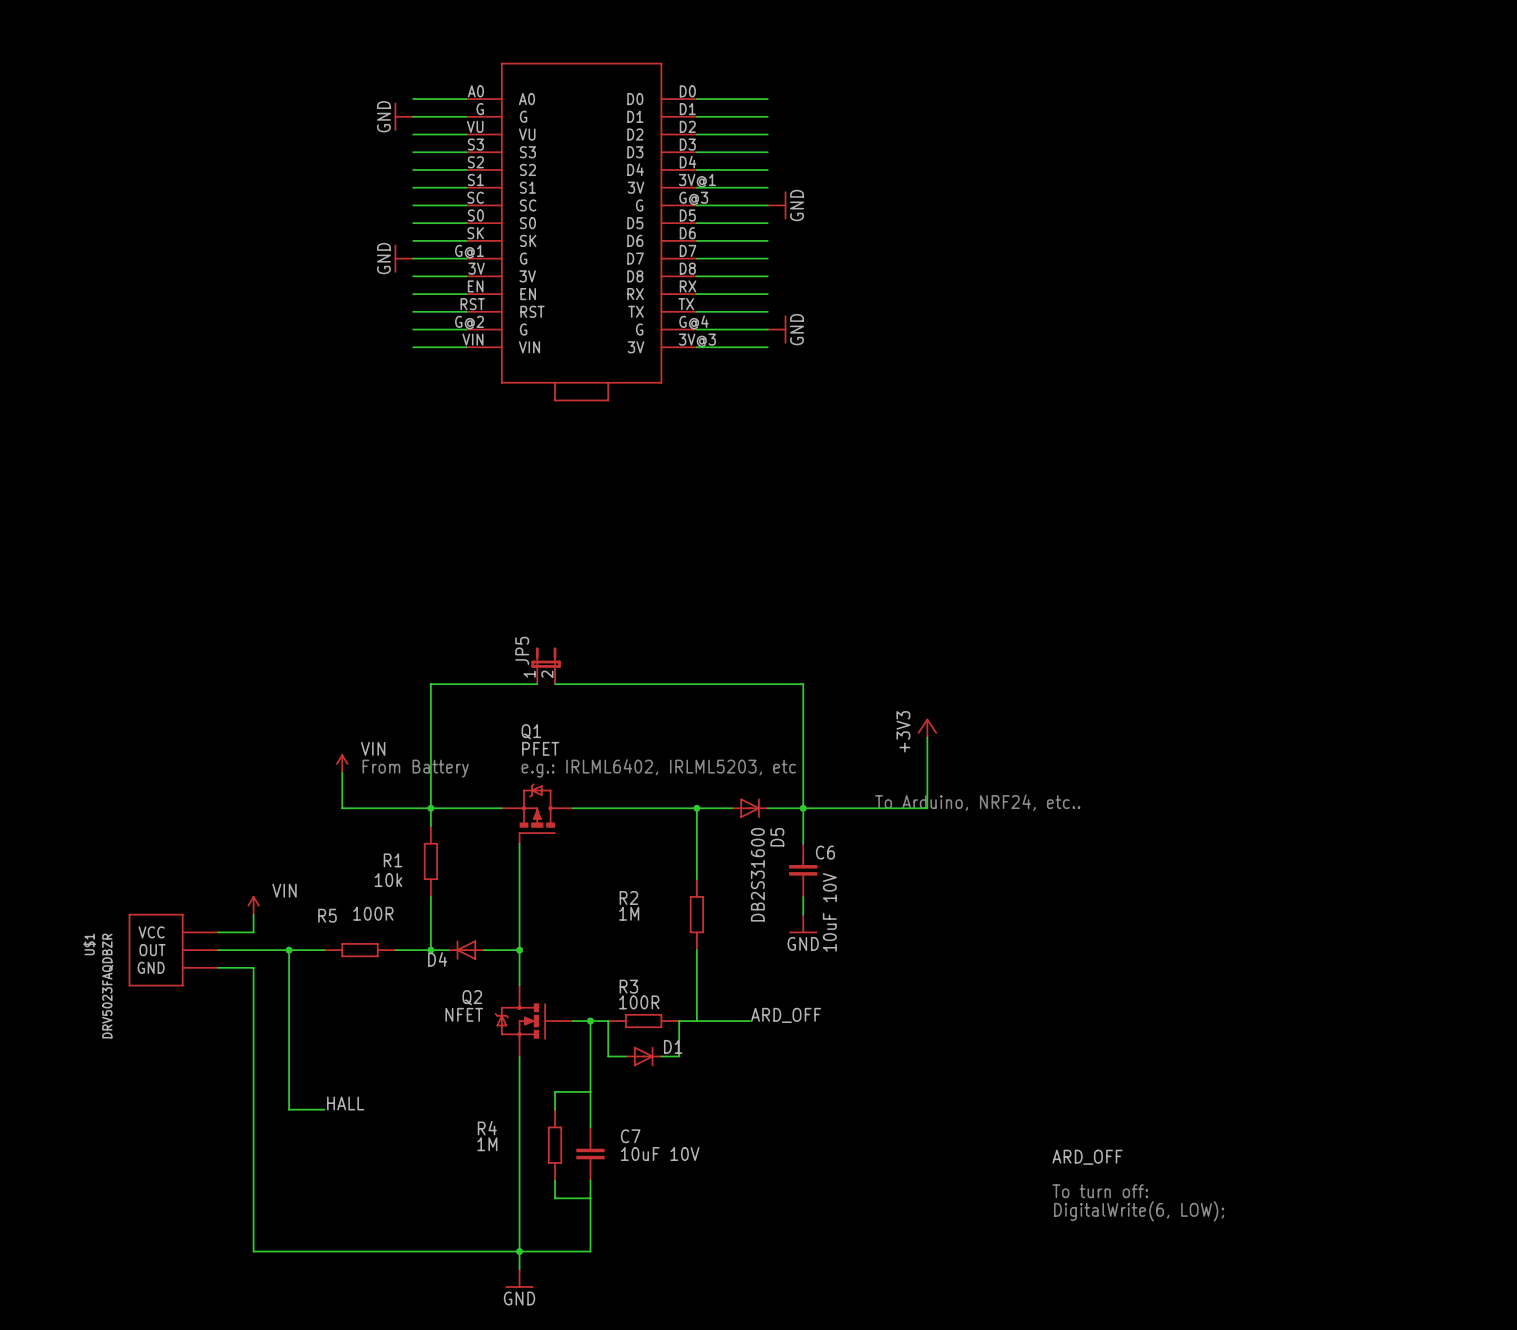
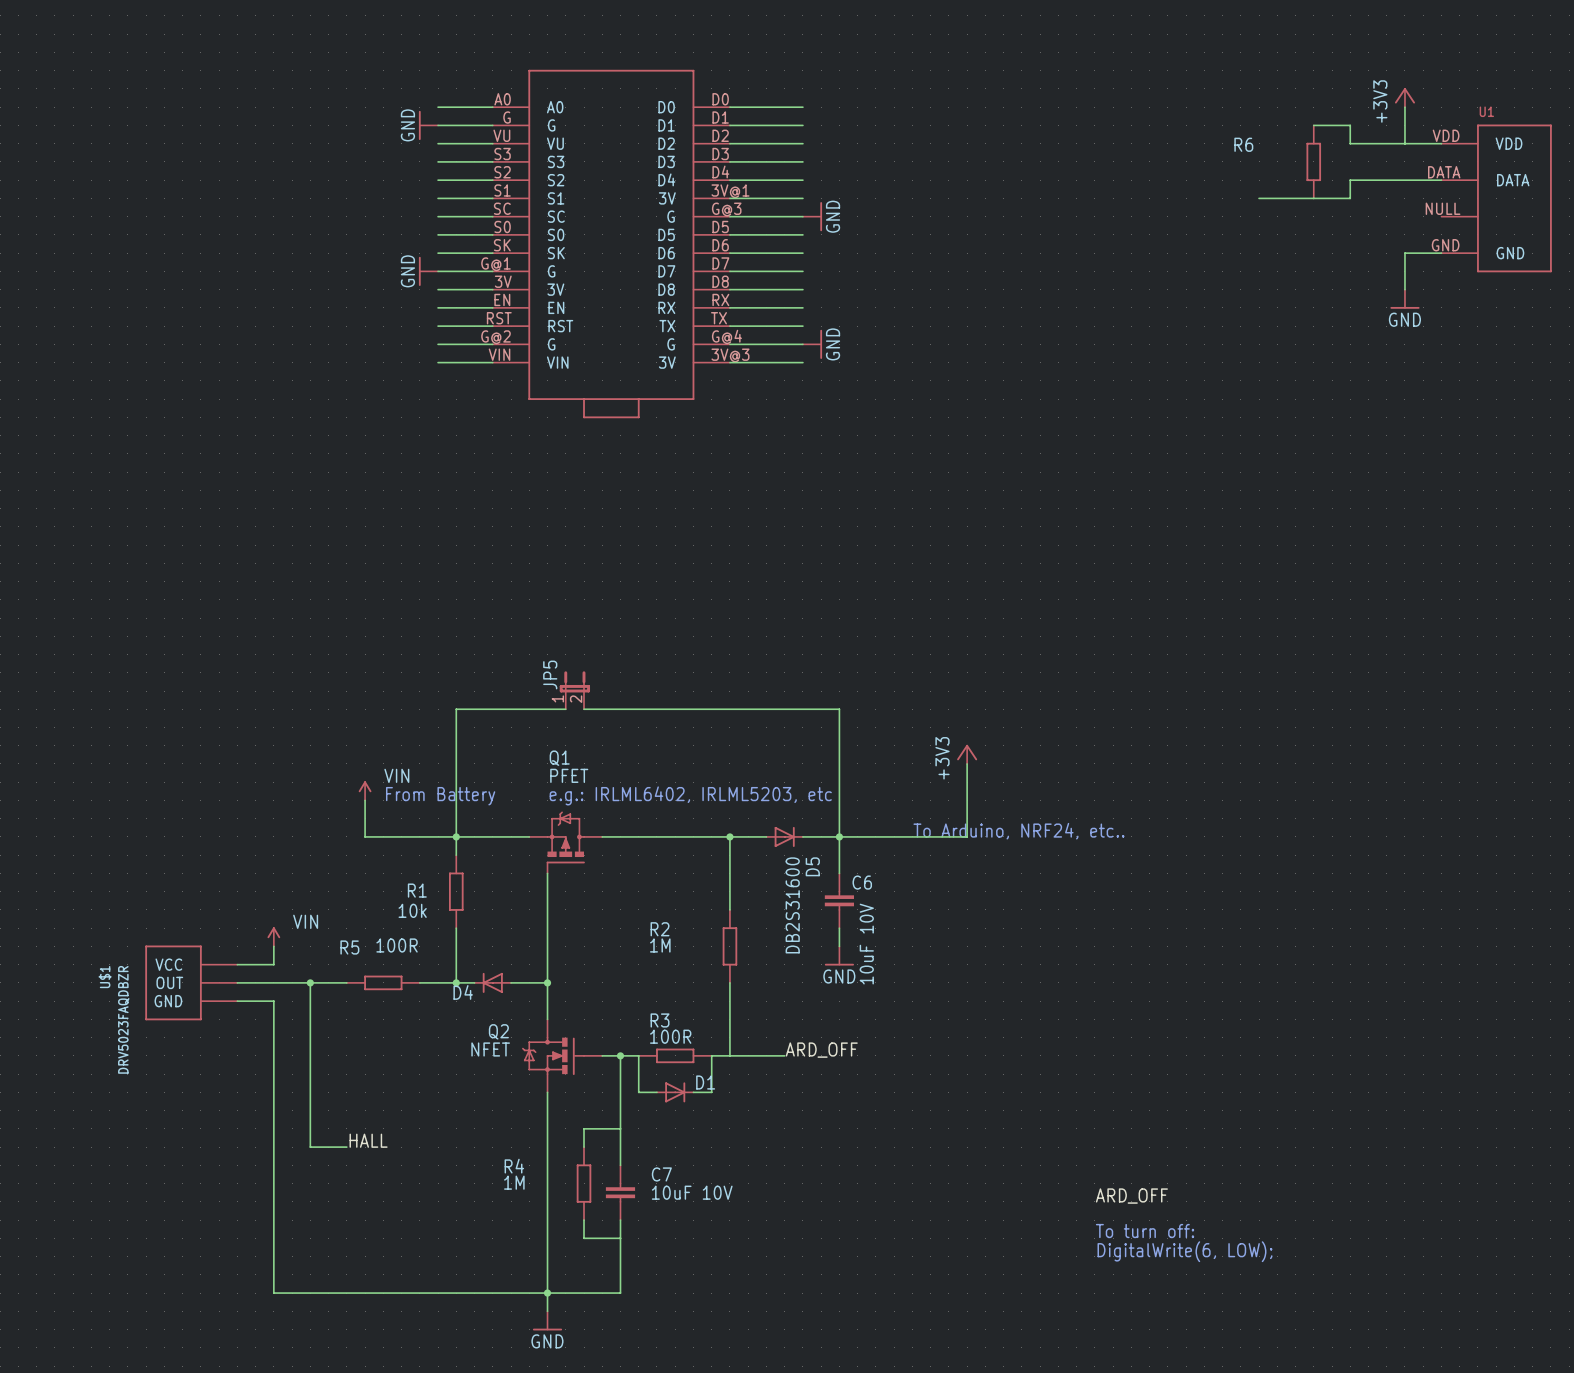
power symbol: none -> +3V3 (1404, 97)
wire: none -> (1404, 107) (1404, 143)
wire: none -> (1313, 125) (1350, 125) (1350, 143) (1441, 143)
R6: none -> (1313, 161)
wire: none -> (1441, 180) (1350, 180) (1350, 198) (1259, 198)
U1: none -> (1496, 198)
wire: none -> (1441, 253) (1404, 253) (1404, 289)
power symbol: none -> GND (1404, 299)

